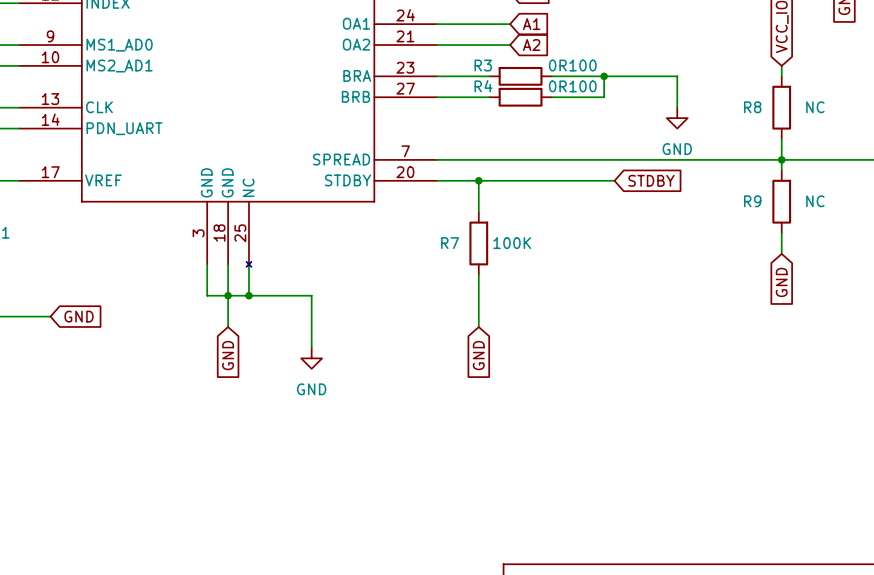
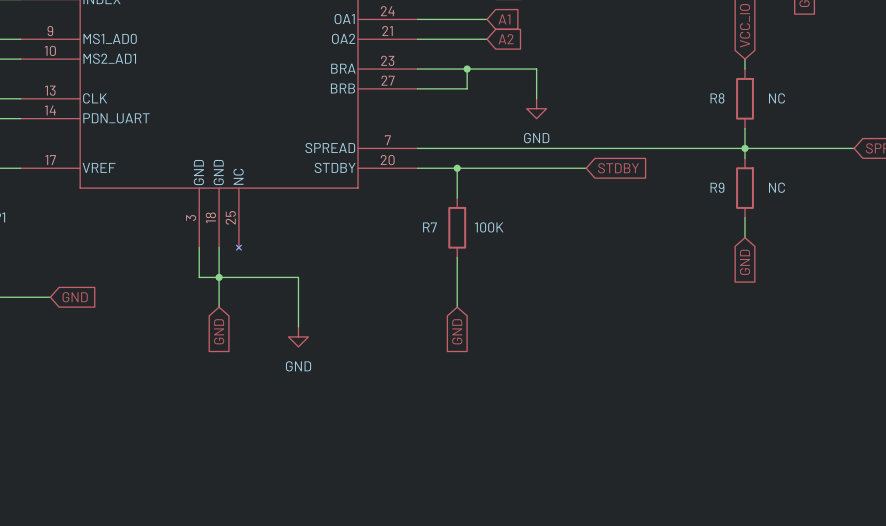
junction: none -> (467, 69)
R3: 0R100 (520, 76) -> none
wire: none -> (526, 69) (467, 69) (467, 88)
wire: (562, 76) (677, 76) (677, 107) -> (536, 69) (536, 98)
wire: (604, 76) (604, 97) (551, 97) -> none
junction: (604, 76) -> none
R4: 0R100 (520, 97) -> none
power symbol position: GND (677, 118) -> GND (536, 108)
wire: (248, 264) (248, 295) -> none
junction: (248, 295) -> none

